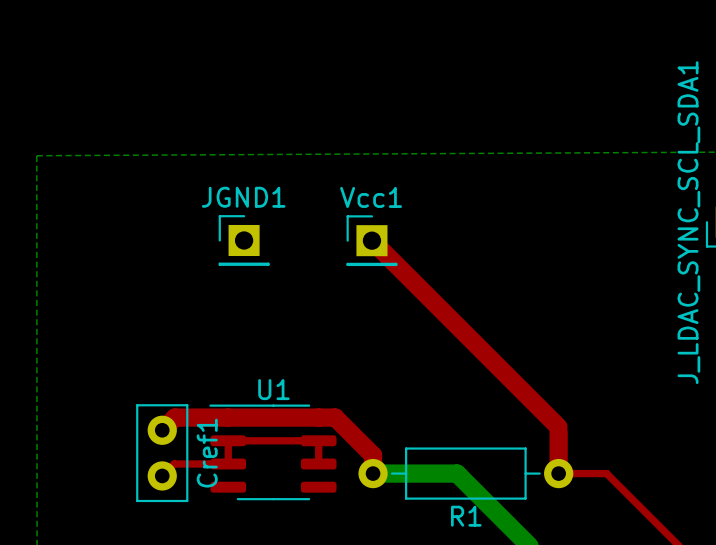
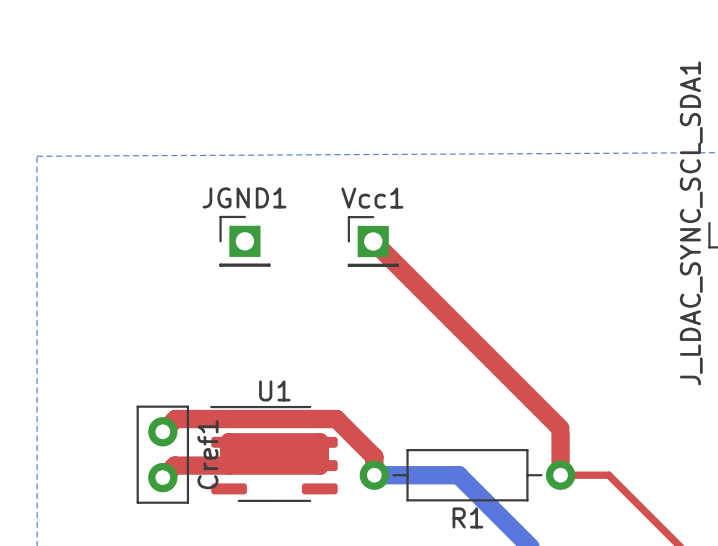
top track: none -> (229, 442) (240, 454) (308, 454) (319, 465) (229, 465)
top track width: thin (318, 463) (318, 440) (228, 440) (228, 463) (174, 463) (162, 475) -> thick (319, 465) (319, 442) (229, 442) (229, 465) (174, 465) (162, 477)

